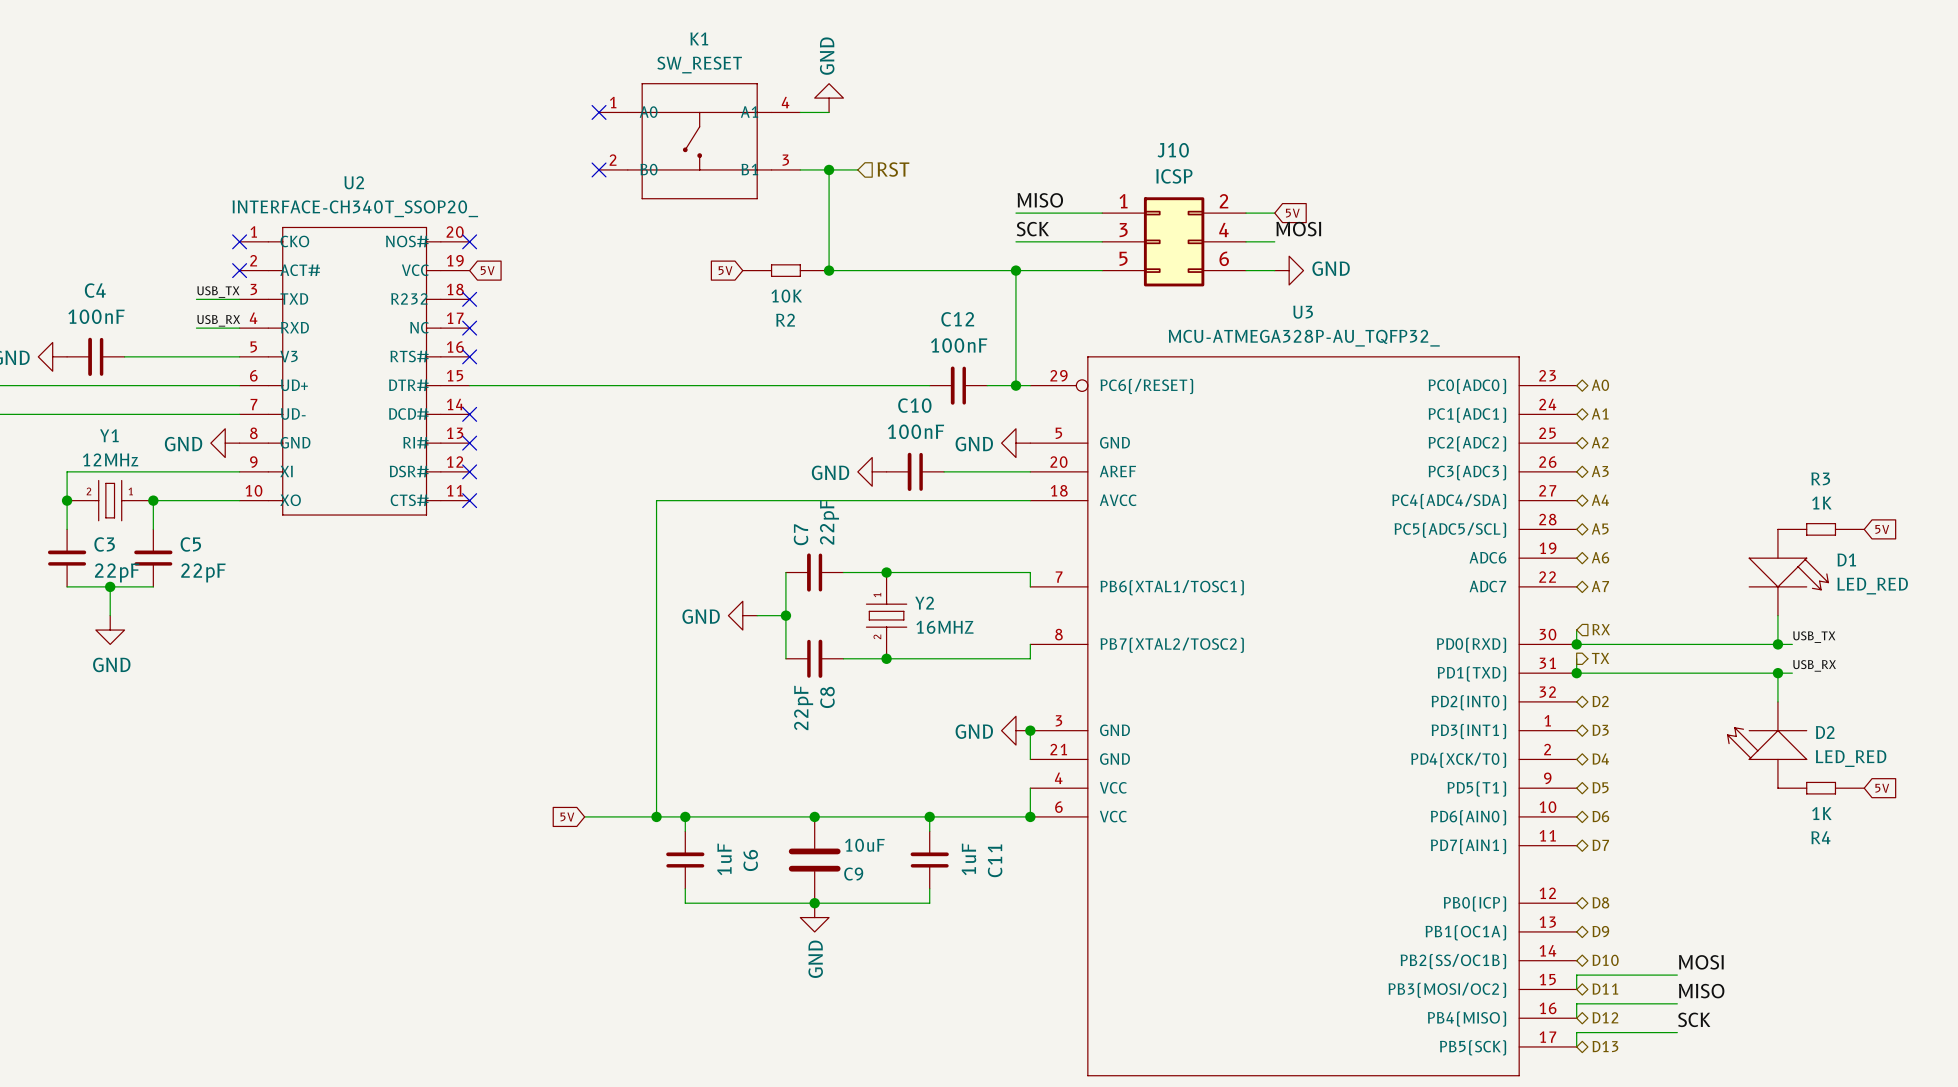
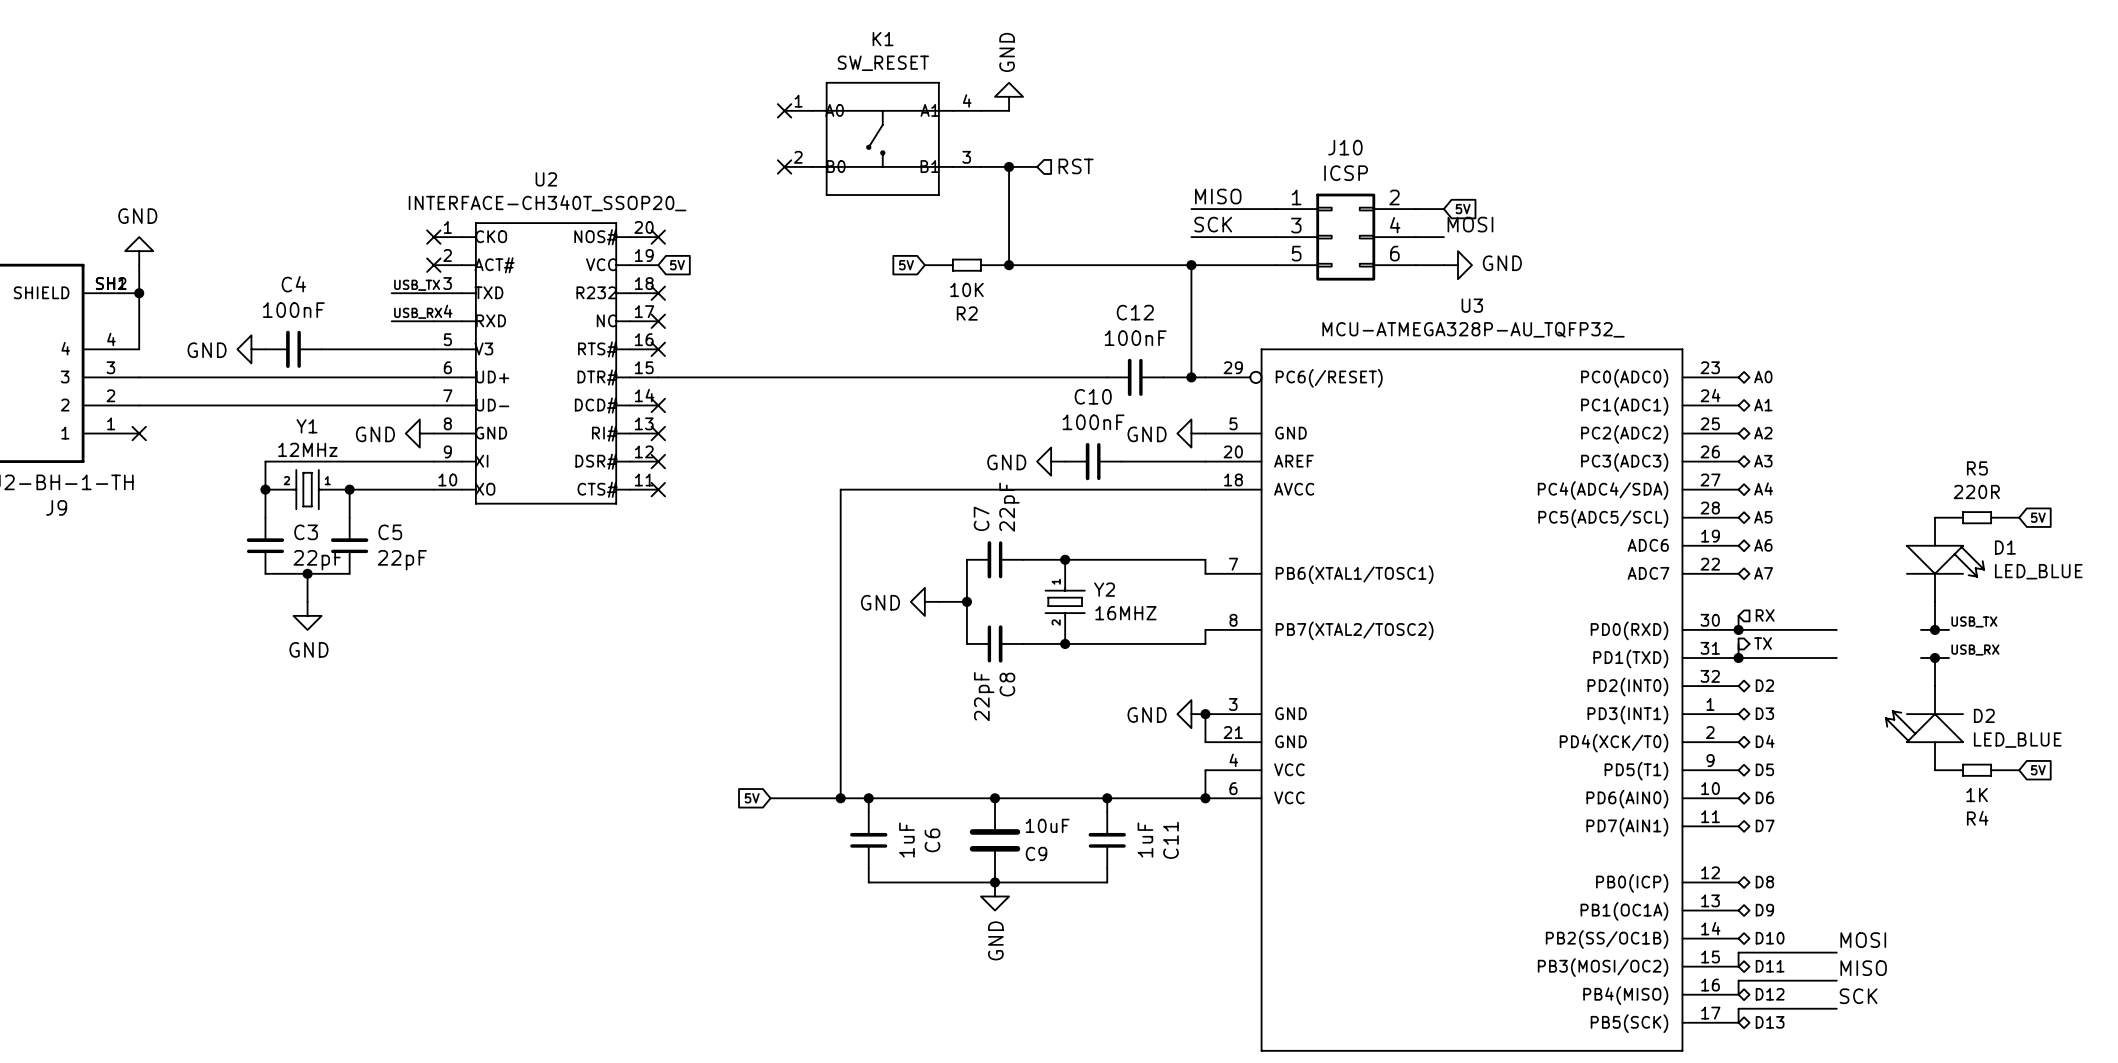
R3 name: R3 (1820, 478) -> R5 (1977, 468)
R3 value: 1K (1821, 503) -> 220R (1976, 491)
D1 value: LED_RED (1872, 586) -> LED_BLUE (2038, 571)
wire: (1677, 644) (1763, 644) -> none
wire: (1677, 673) (1763, 673) -> none
D2 value: LED_RED (1851, 758) -> LED_BLUE (2017, 740)

